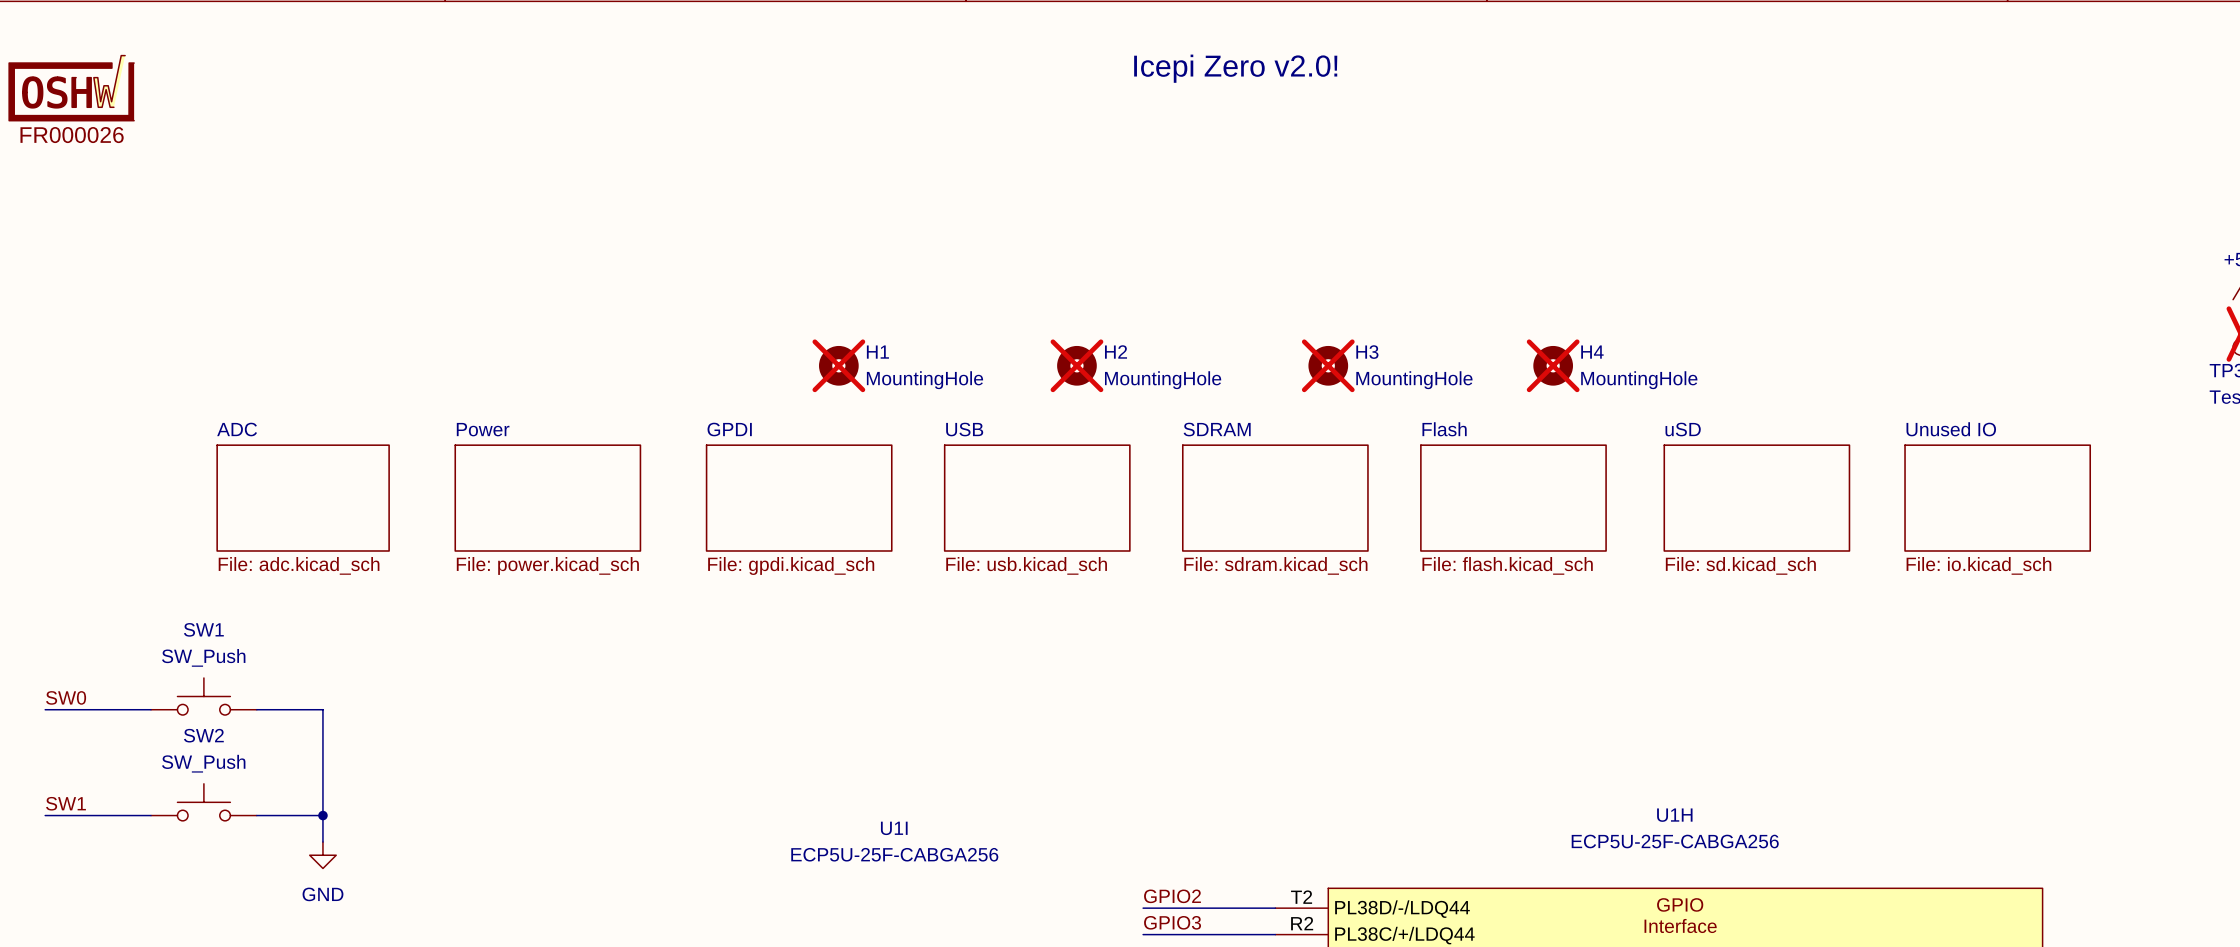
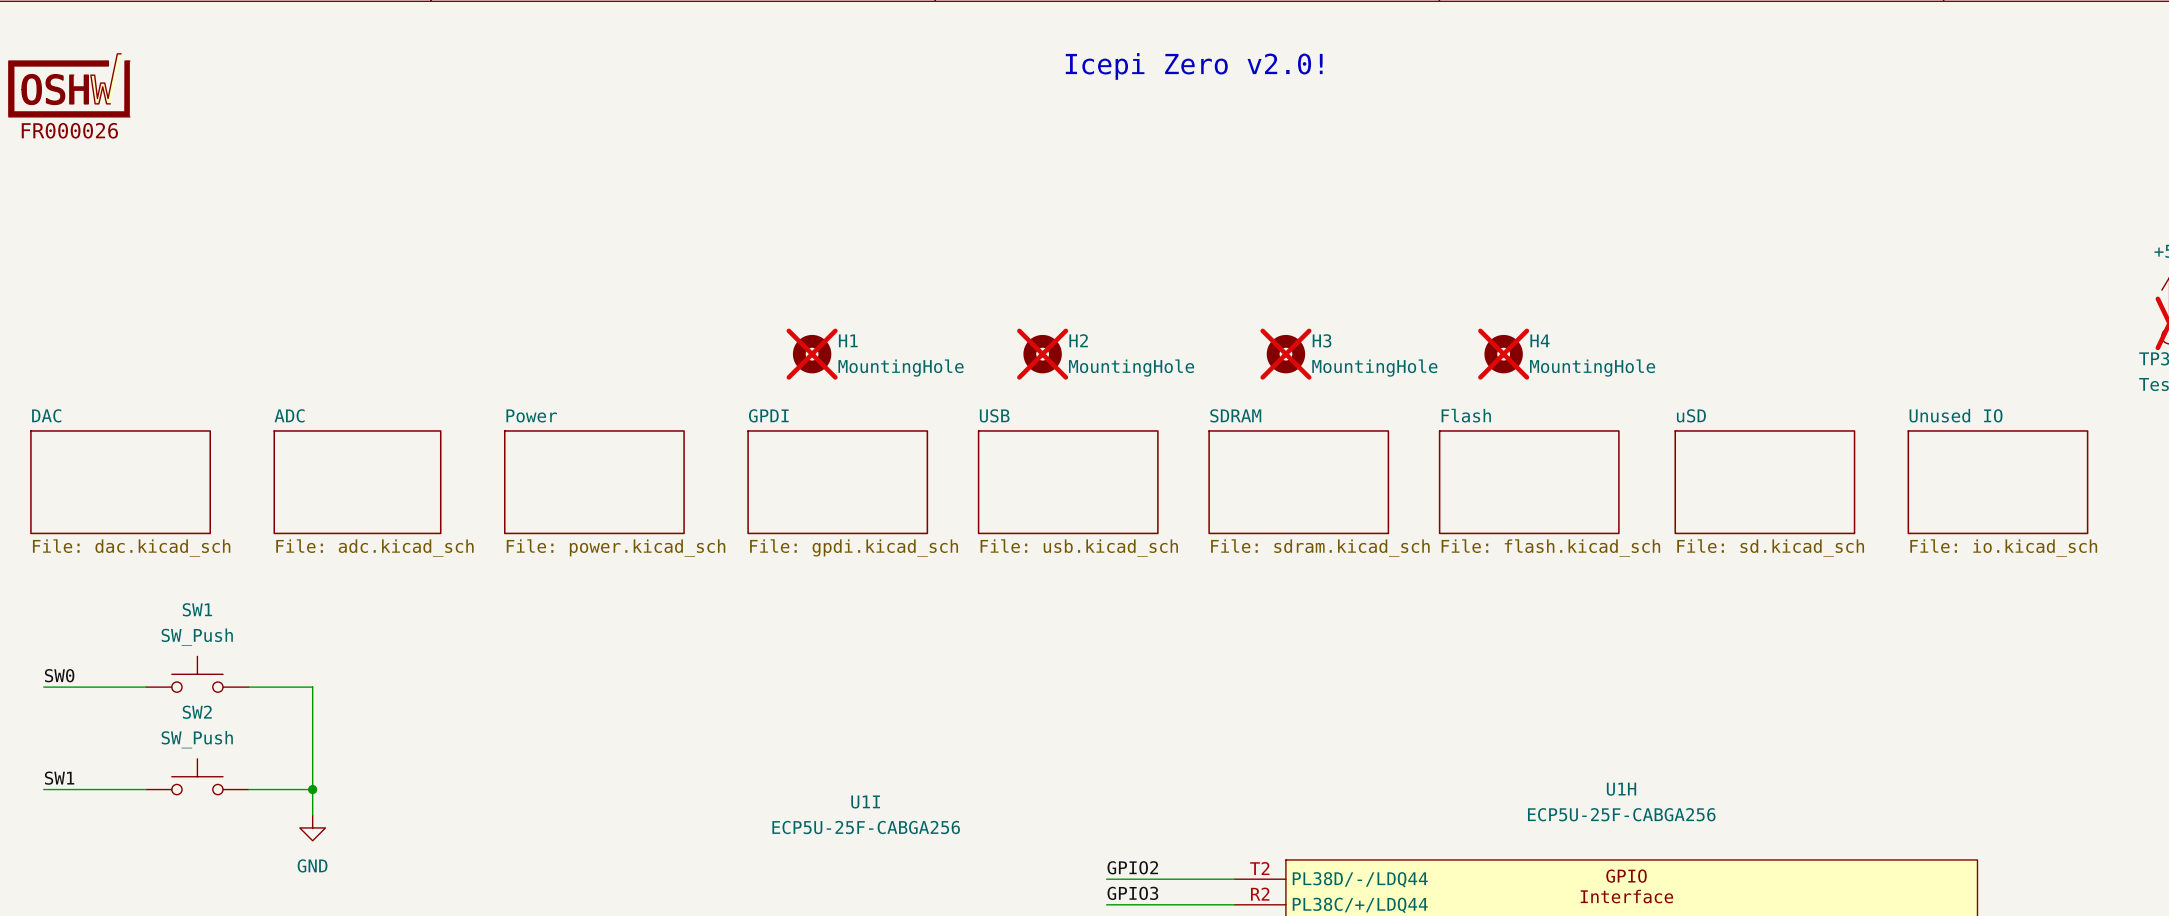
sheet DAC: none -> File: dac.kicad_sch (120, 482)
sheet ADC position: (303, 498) -> (357, 482)
sheet Power position: (547, 498) -> (594, 482)
sheet GPDI position: (799, 498) -> (837, 482)
sheet USB position: (1037, 498) -> (1068, 482)
sheet SDRAM position: (1275, 498) -> (1298, 482)
sheet Flash position: (1513, 498) -> (1529, 482)
sheet uSD position: (1756, 498) -> (1764, 482)
sheet Unused IO position: (1997, 498) -> (1997, 482)

